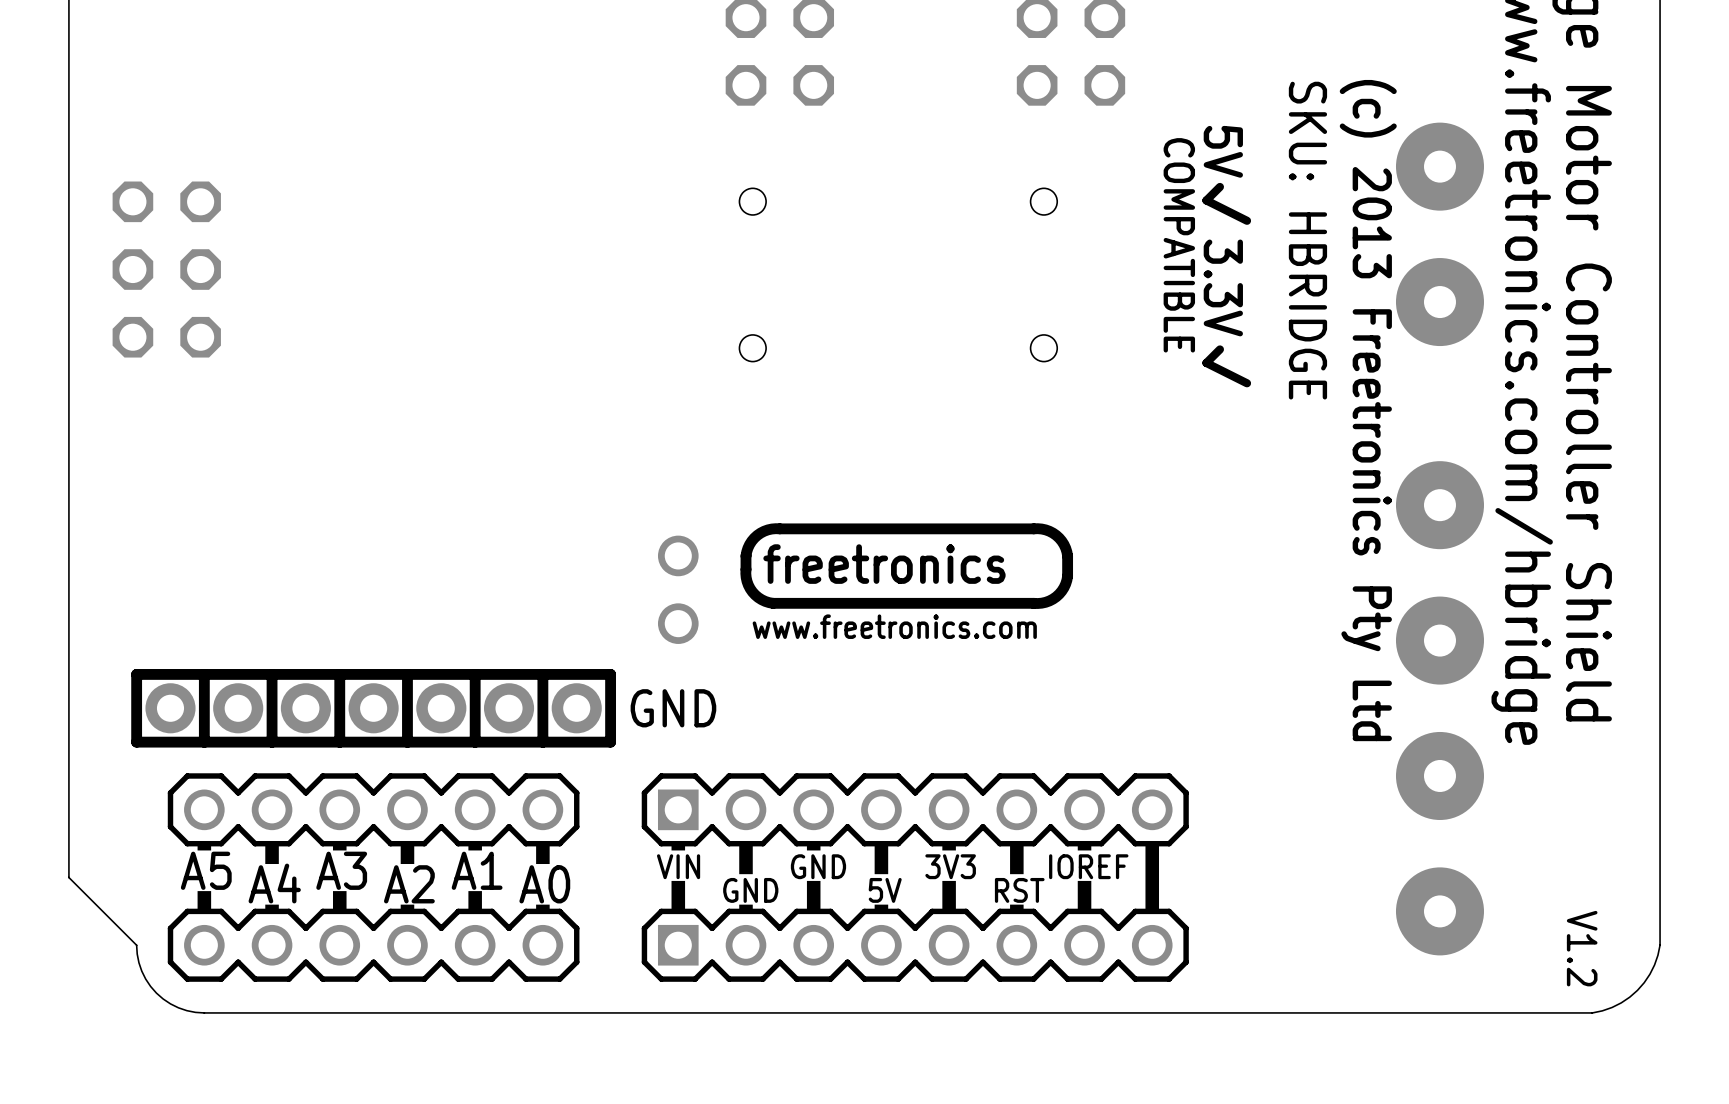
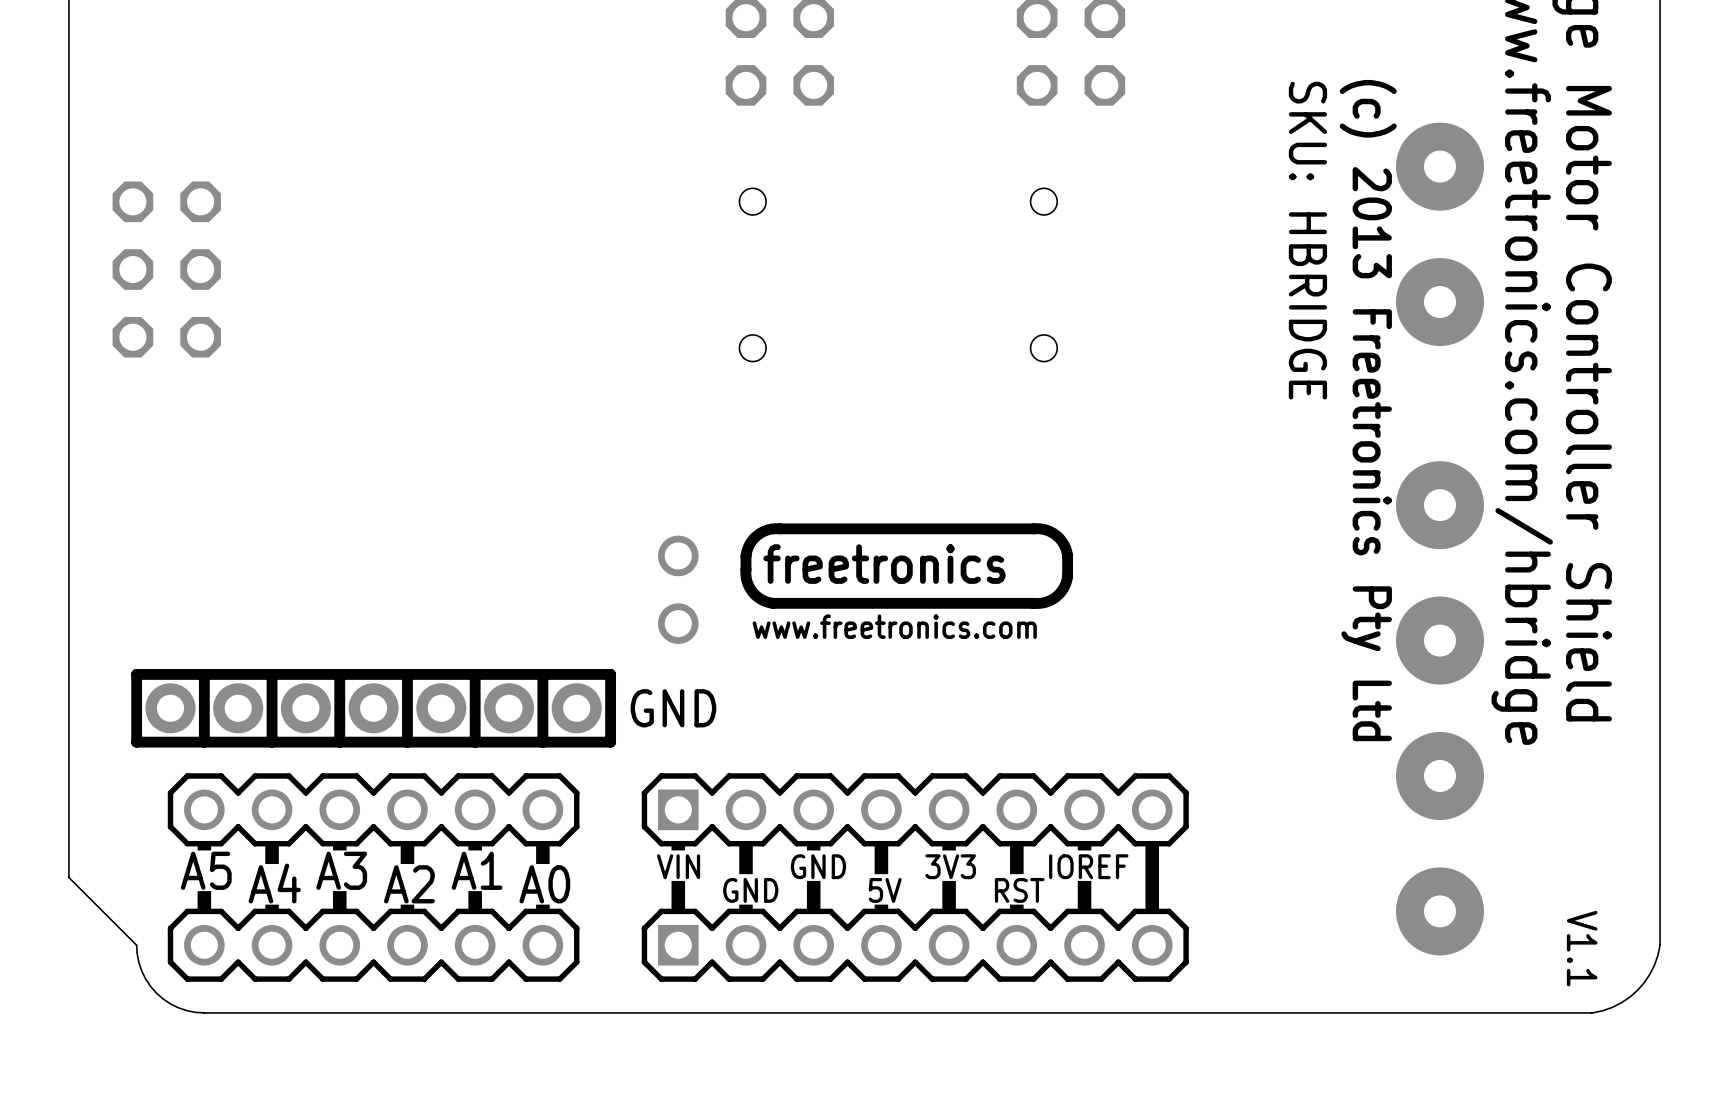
text: 5V (1223, 151) -> none
line: (1219, 186) (1206, 200) (1247, 220) -> none
text: COMPATIBLE (1179, 245) -> none
text: 3.3V (1223, 287) -> none
line: (1219, 349) (1206, 362) (1247, 383) -> none
text: V1.2 (1582, 948) -> V1.1 (1582, 948)

